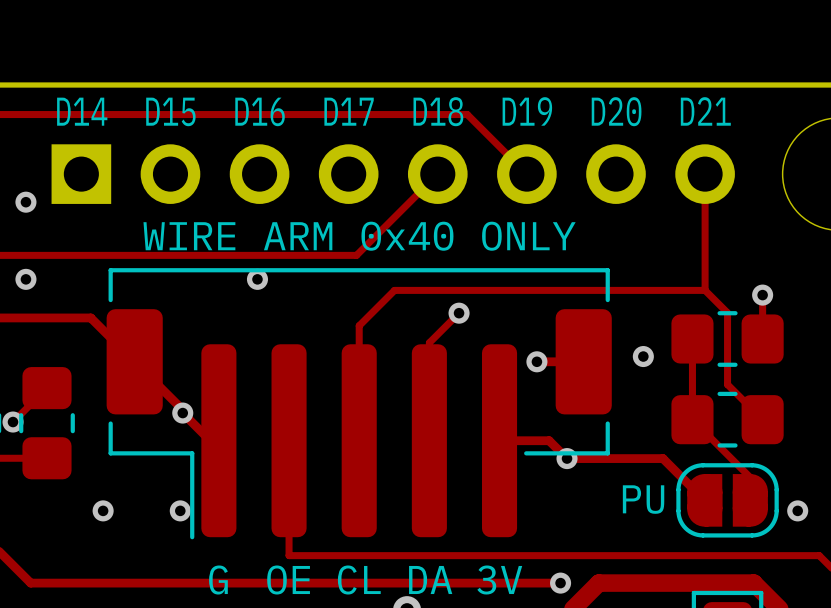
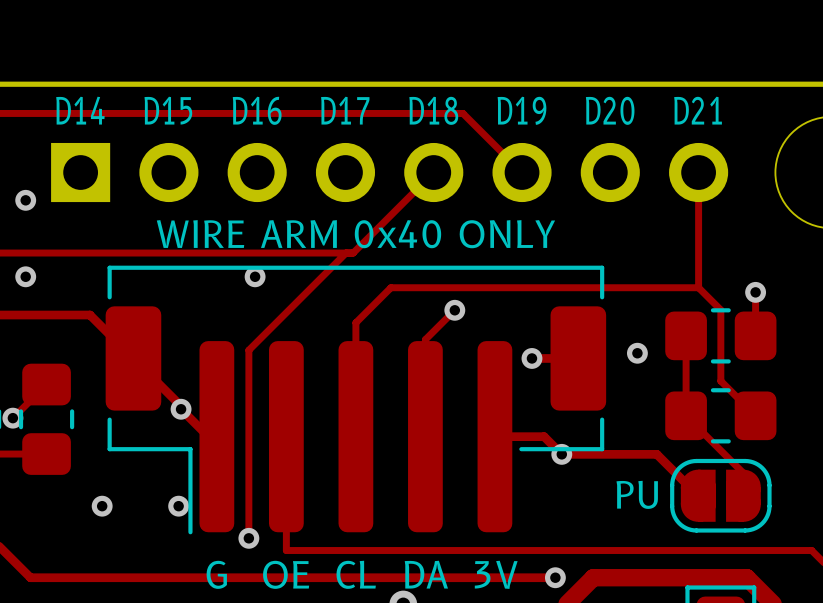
track: none -> (346, 253) (248, 350) (248, 538)
via: (797, 510) -> none
via: none -> (248, 538)

